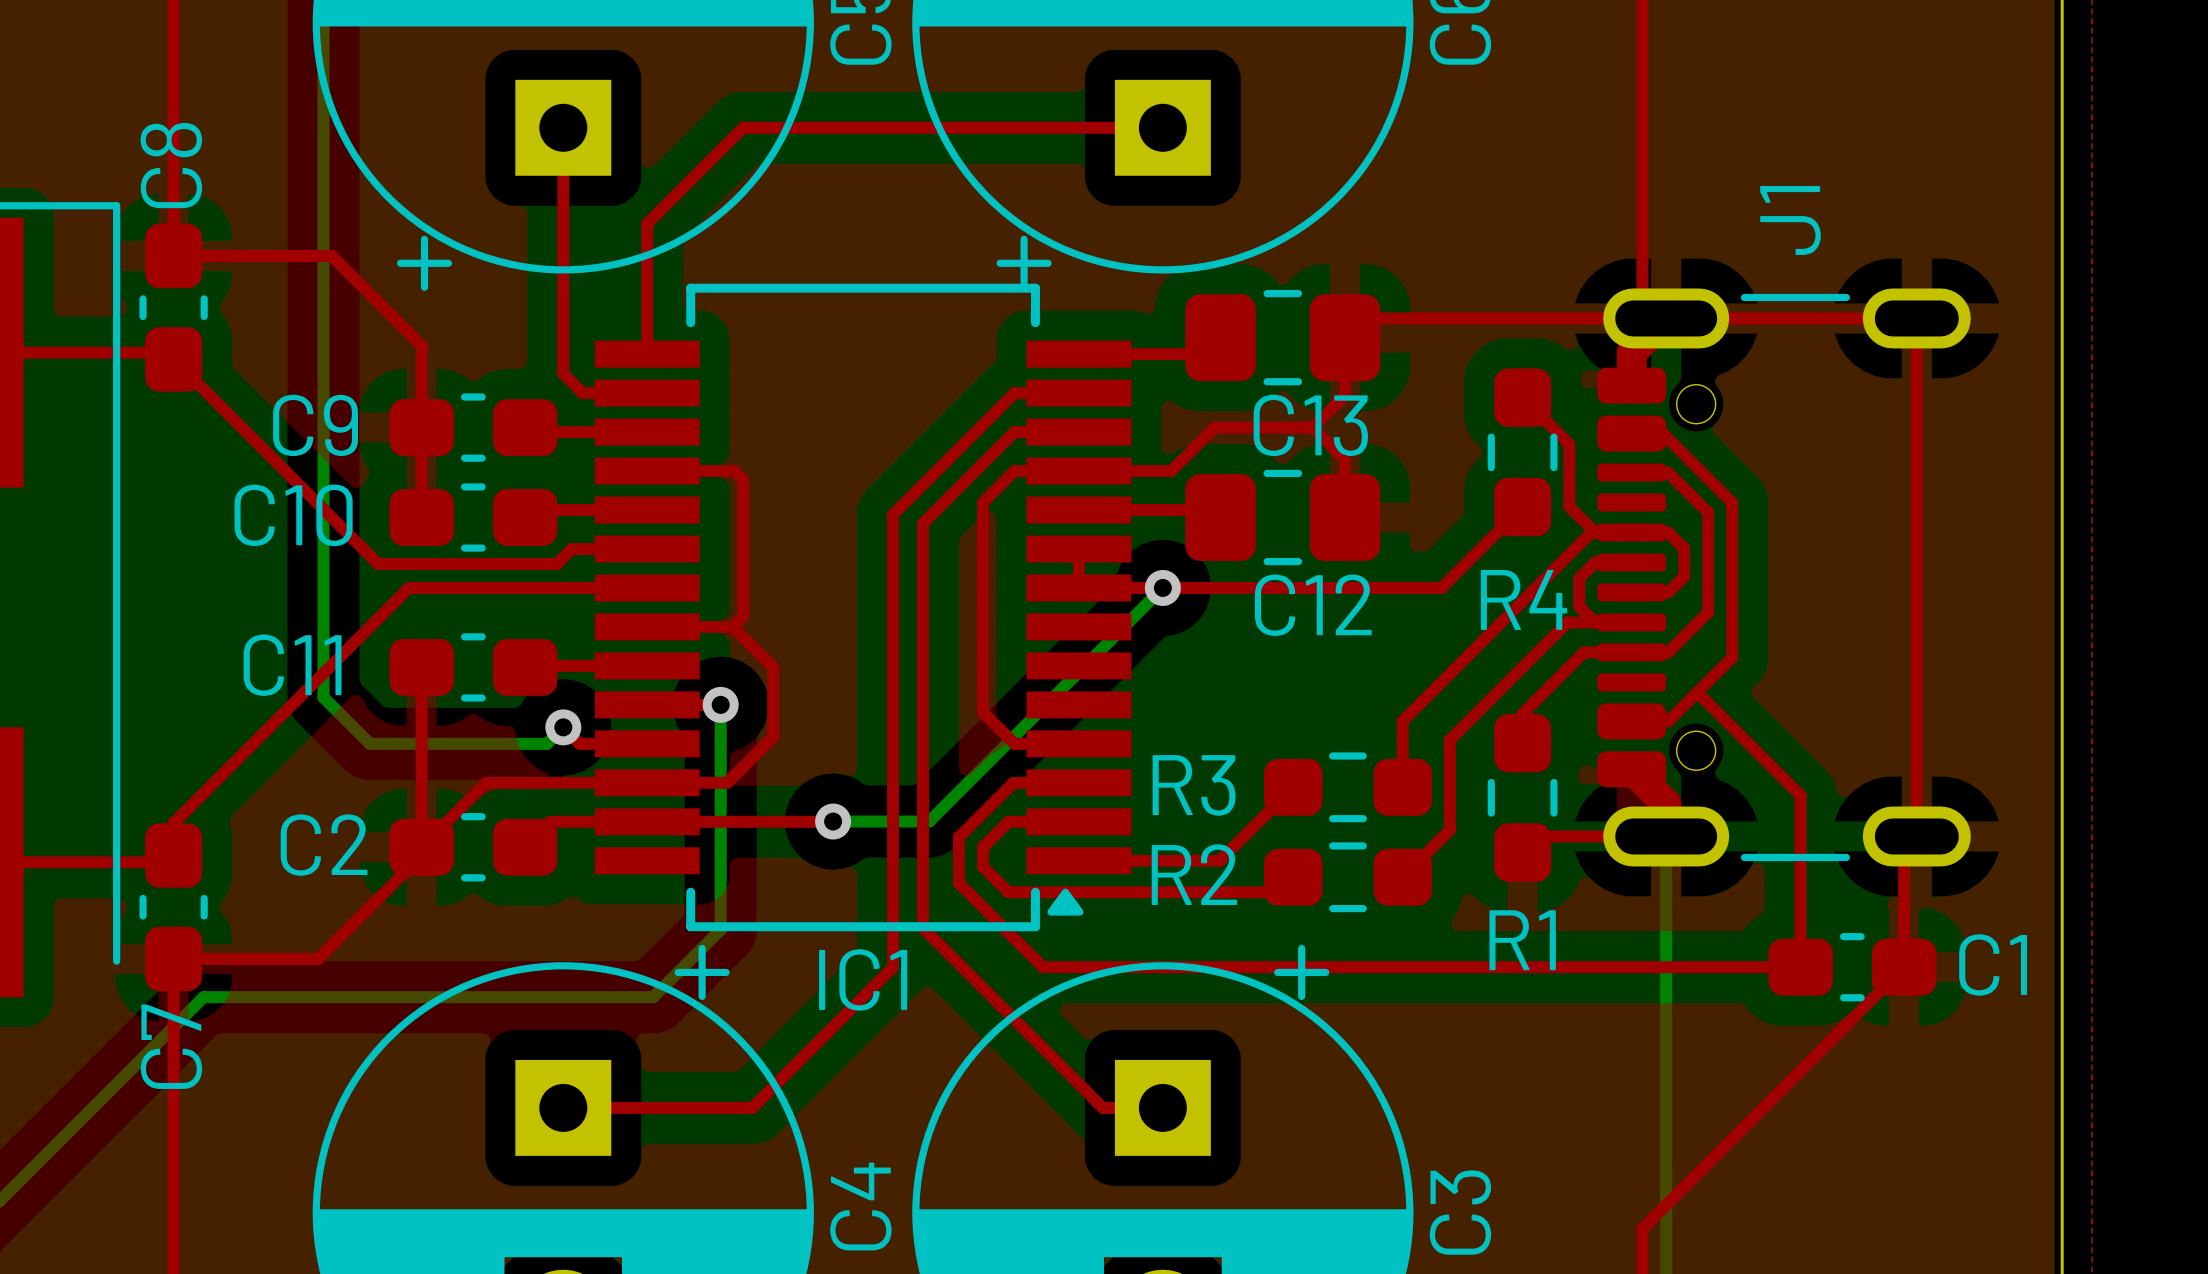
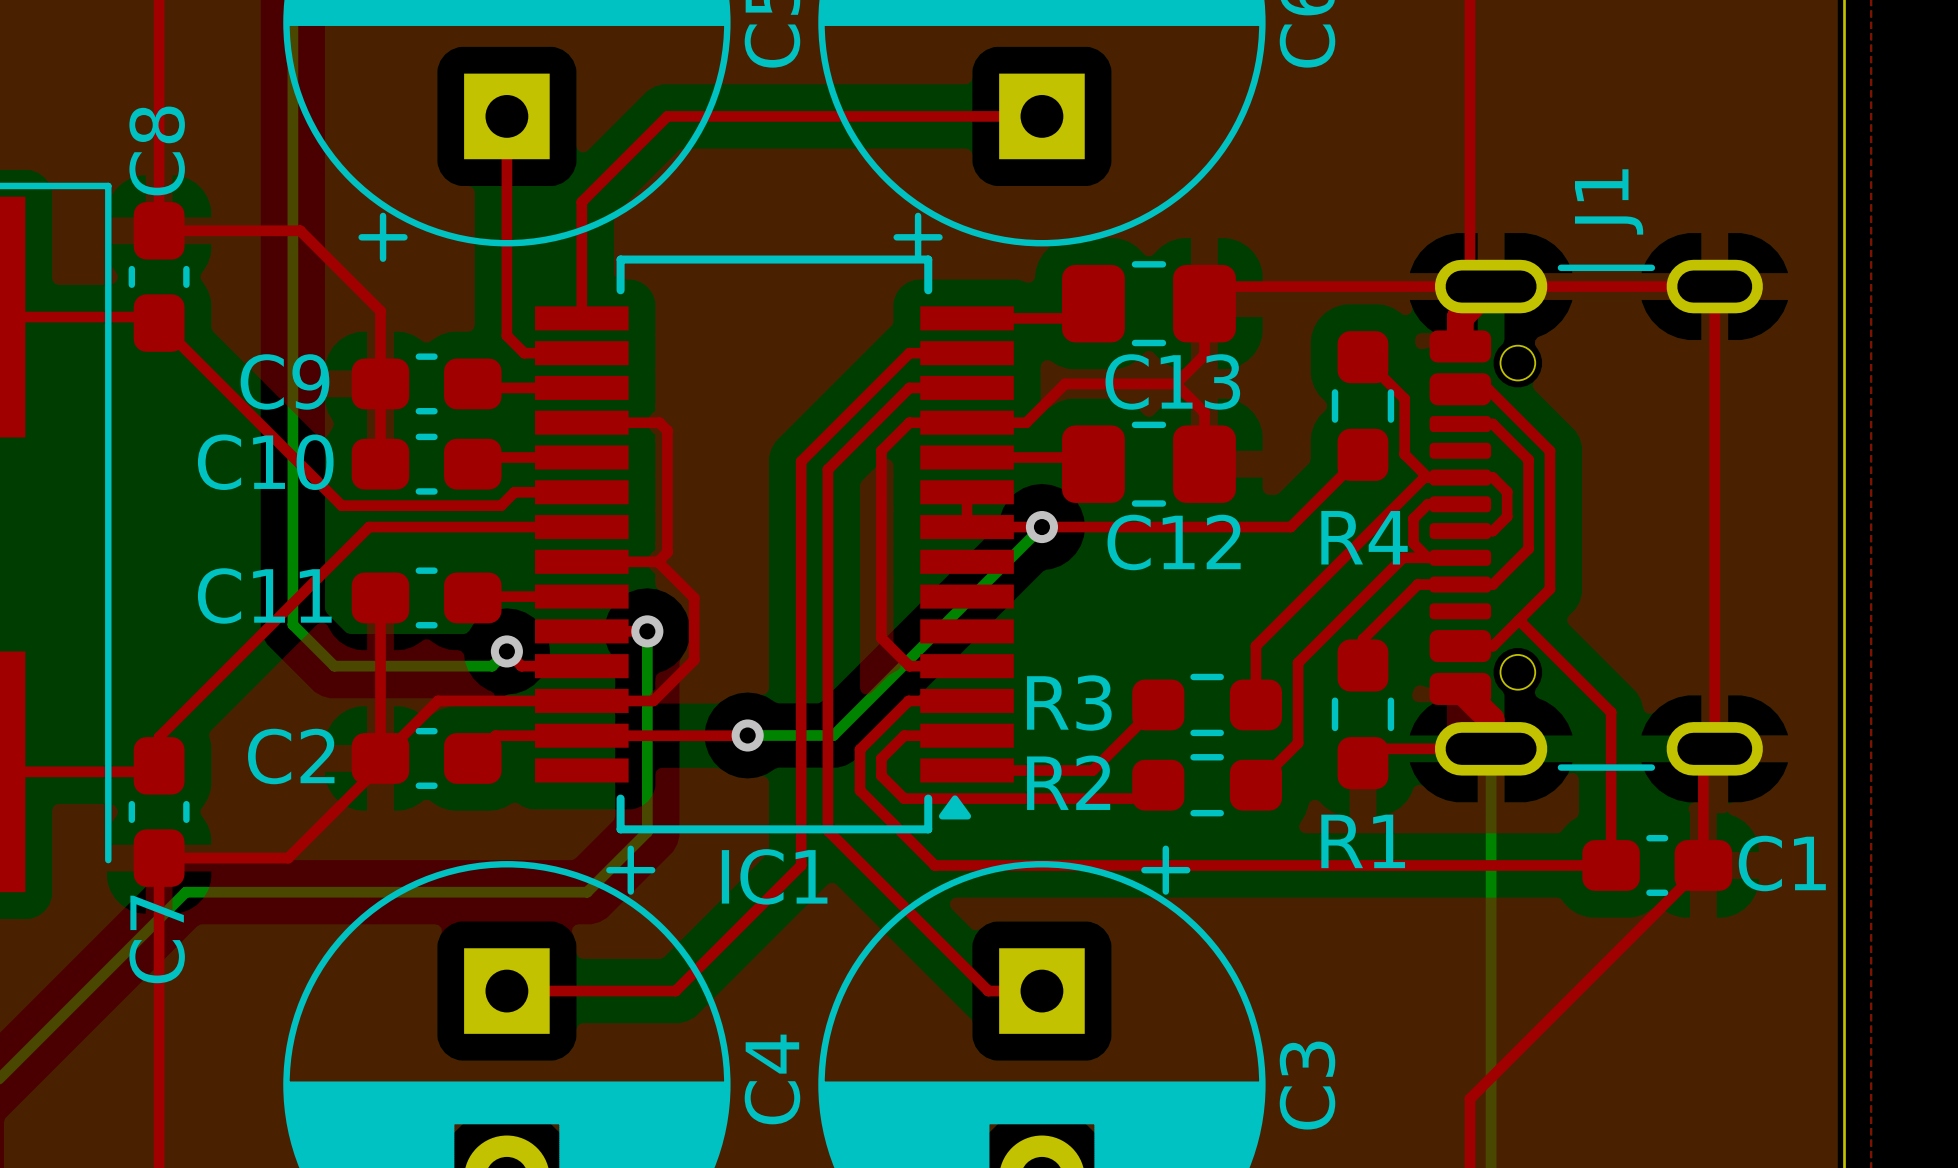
top track: (1214, 427) (1171, 471) (1145, 471) -> (1088, 383) (1065, 383) (1026, 422)

